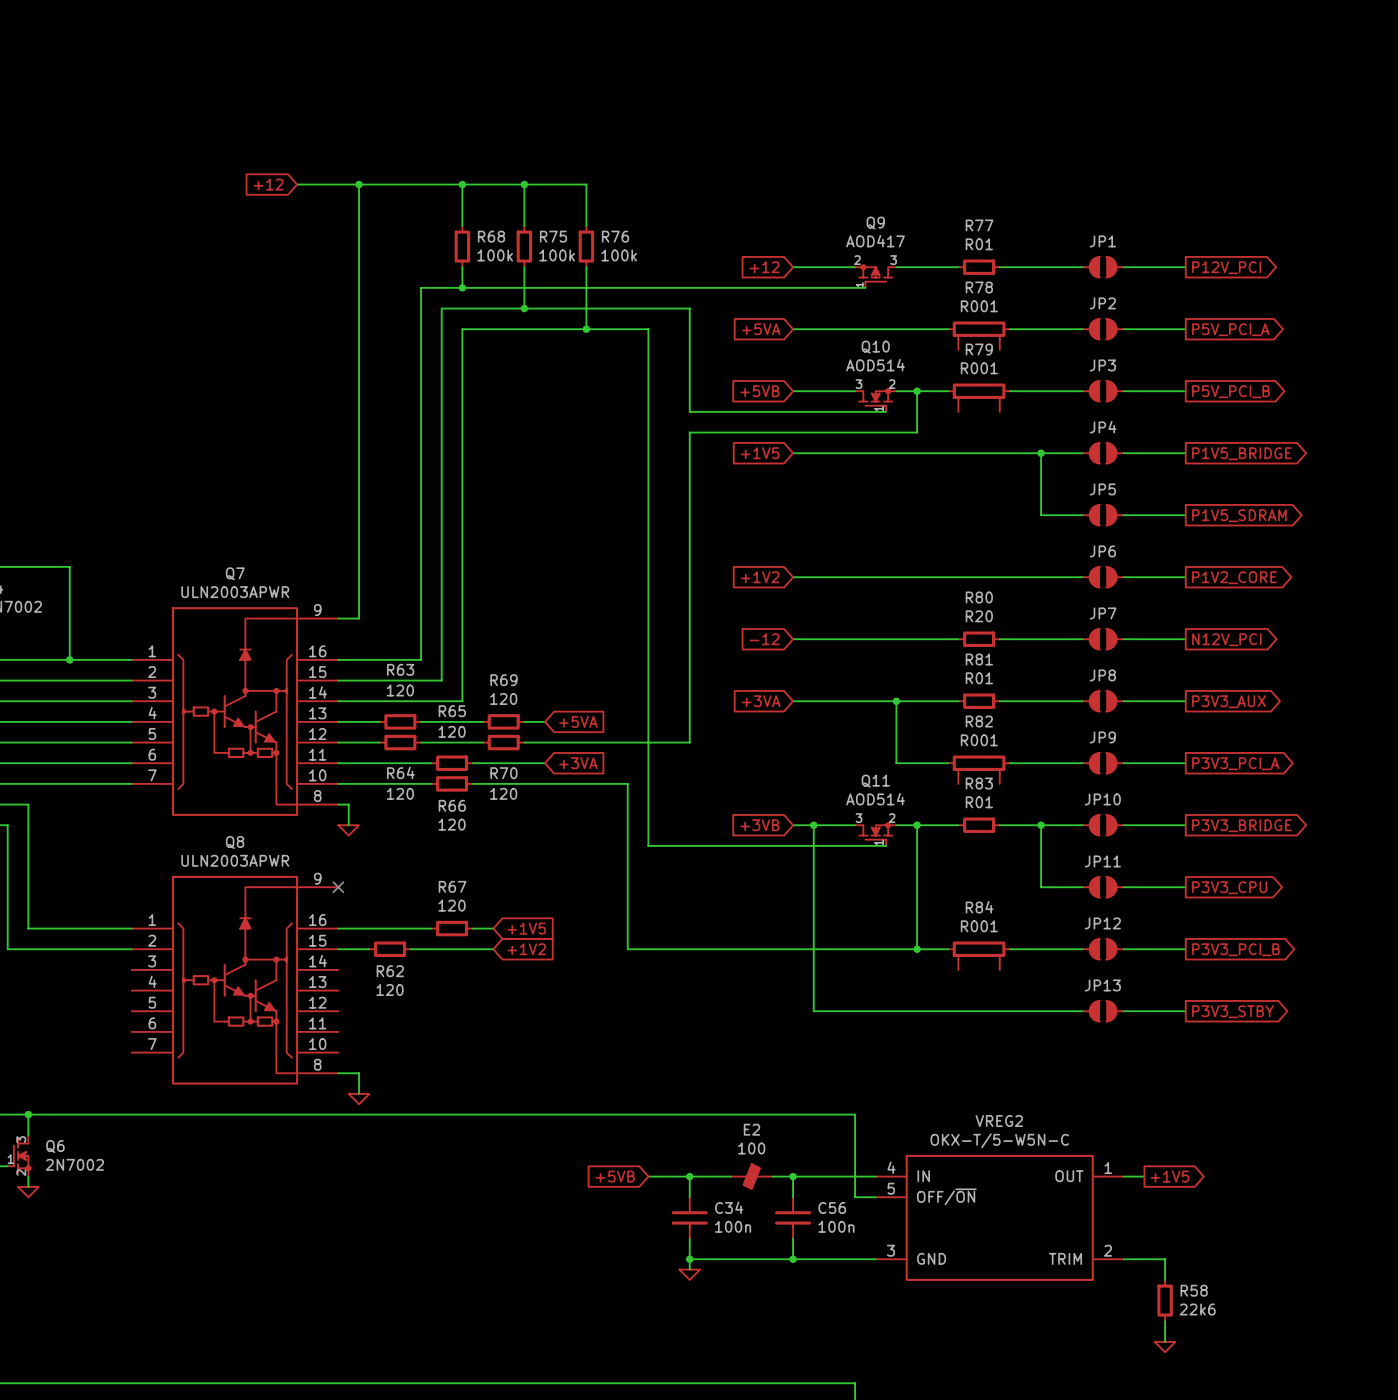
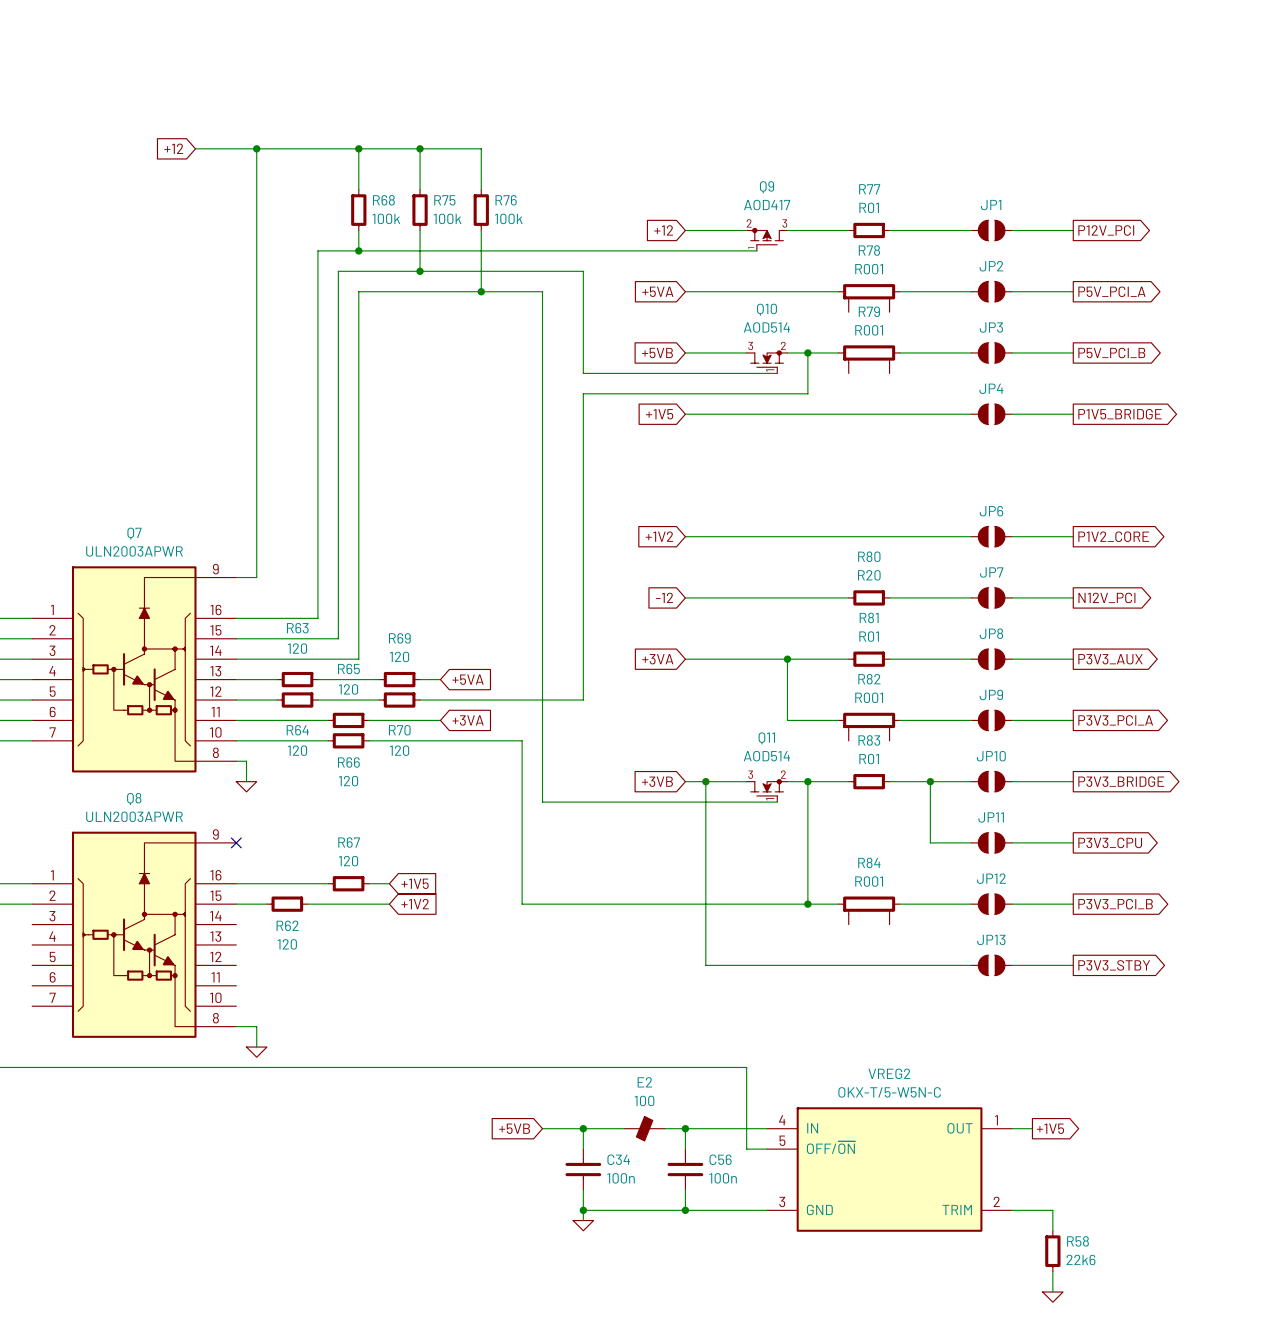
wire: (1041, 453) (1041, 515) (1082, 515) -> none
junction: (1041, 453) -> none
JP5: (1103, 515) -> none
wire: (1123, 515) (1185, 515) -> none
global label: P1V5_SDRAM (1239, 515) -> none

